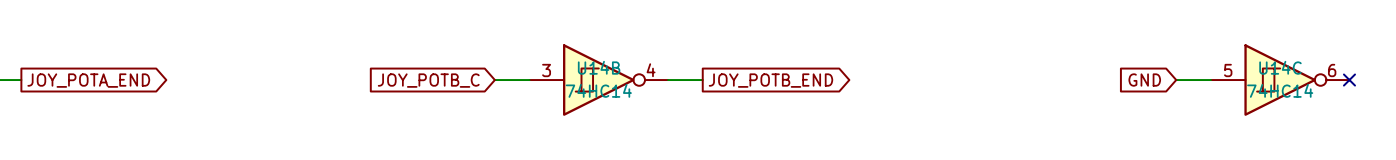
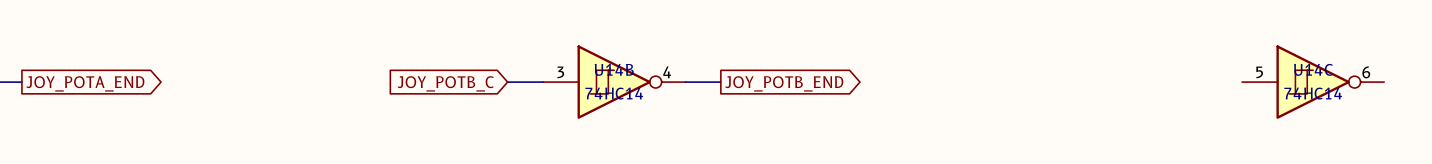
global label: GND (1144, 80) -> none
wire: (1176, 80) (1210, 80) -> none
no-connect mark: (1349, 80) -> none

